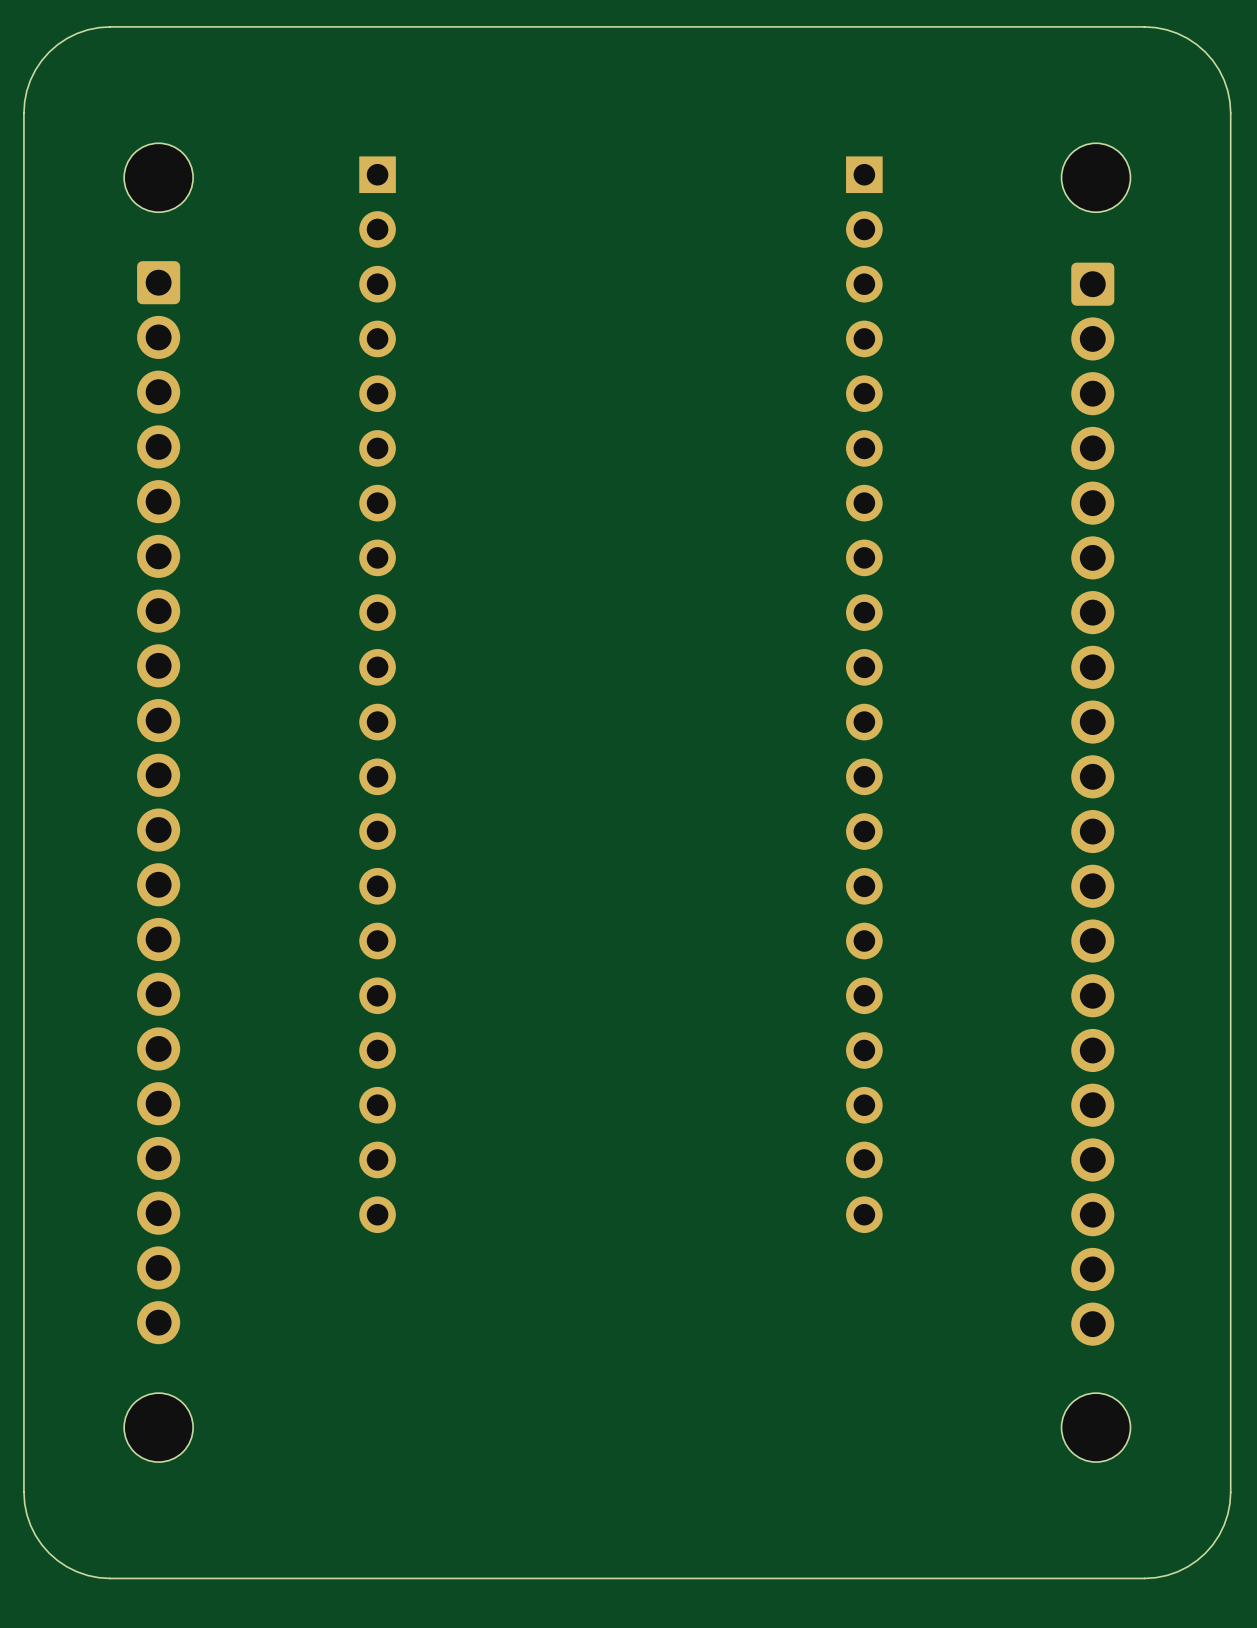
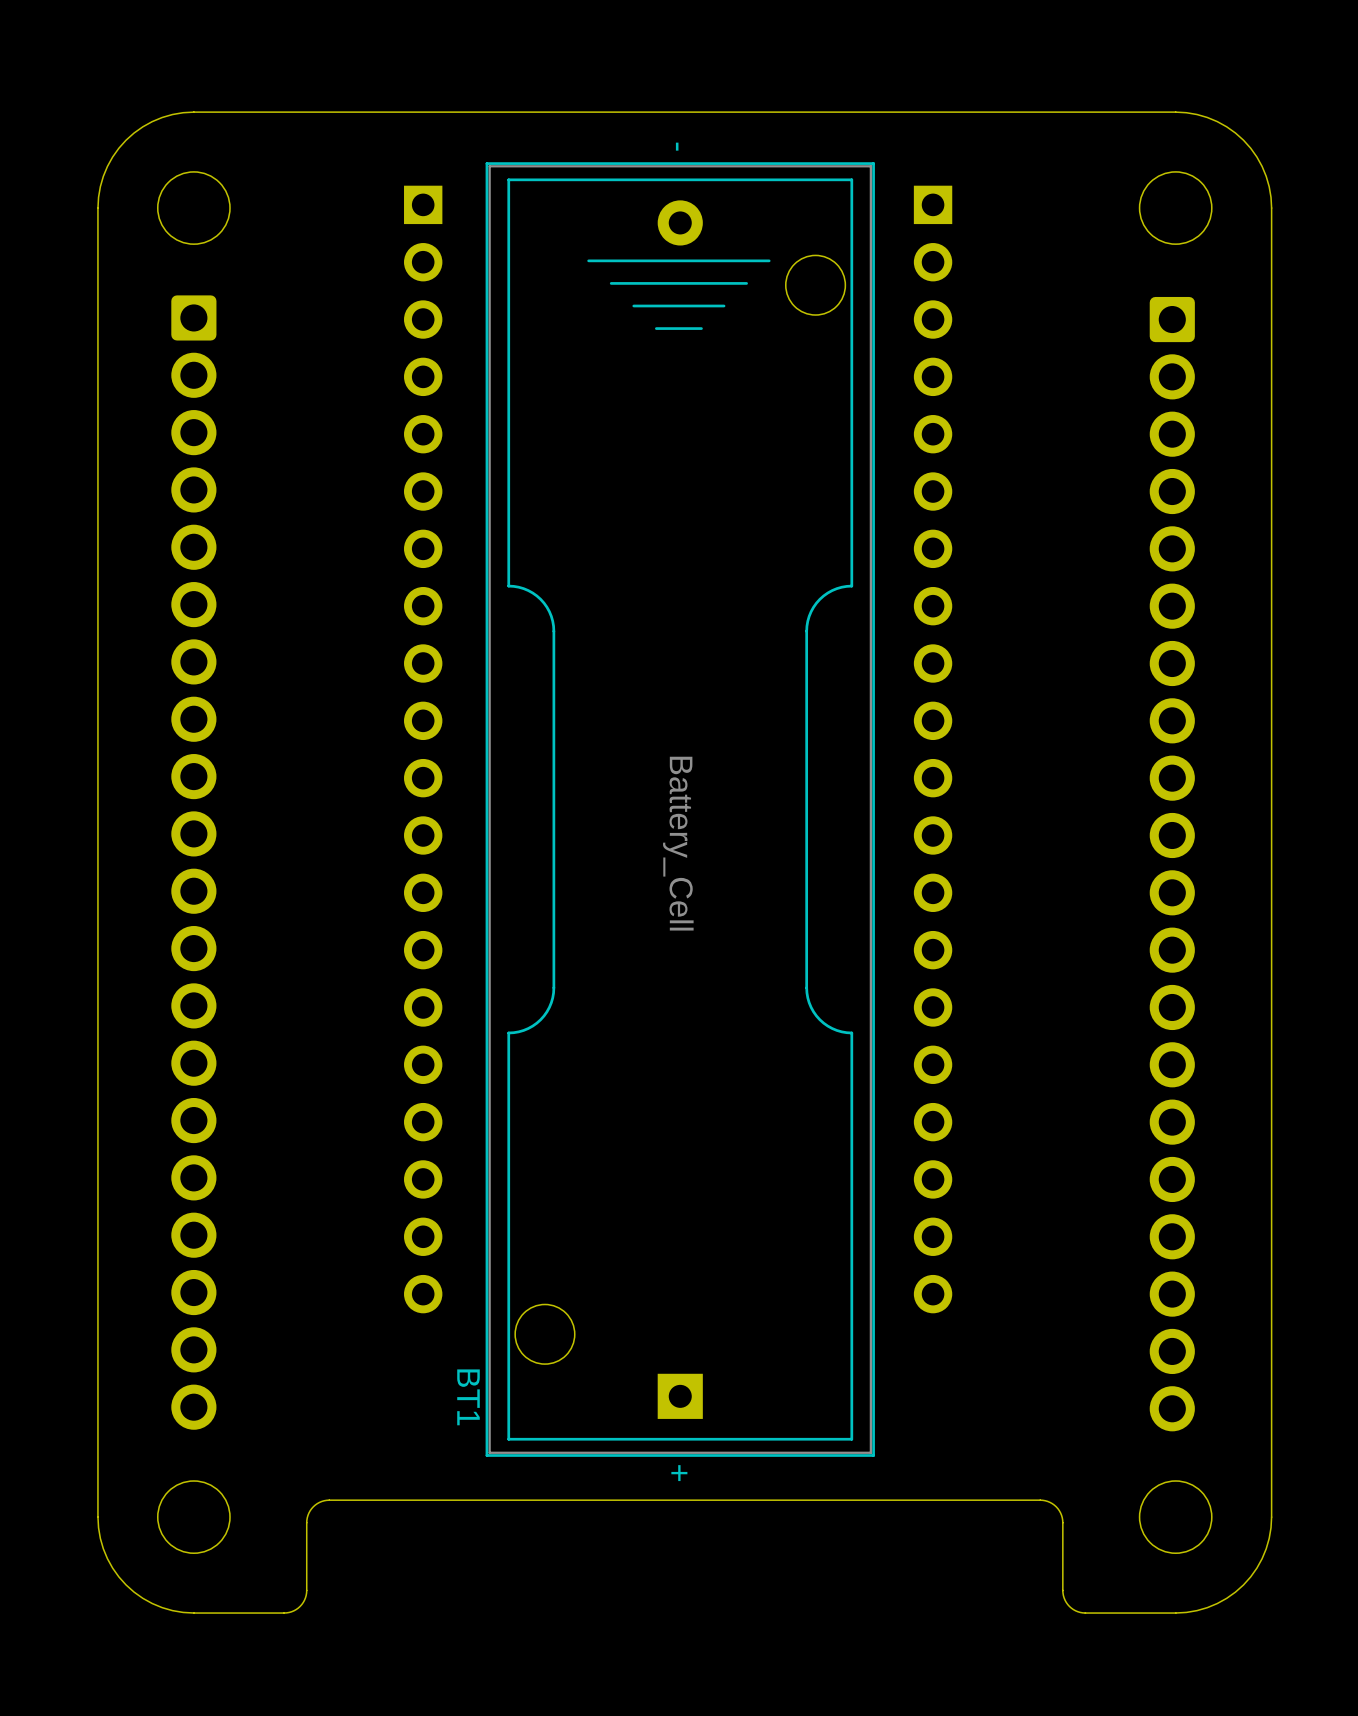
board edge: (1144, 26) (110, 26) (87, 29) (67, 38) (41, 60) (30, 80) (23, 113) (23, 1492) (26, 1514) (35, 1535) (57, 1560) (77, 1571) (110, 1578) (1144, 1578) (1166, 1575) (1187, 1566) (1212, 1544) (1224, 1525) (1230, 1492) (1230, 113) (1224, 80) (1205, 52) (1177, 33) (1144, 26) -> (1175, 112) (1197, 114) (1217, 121) (1243, 140) (1262, 166) (1269, 186) (1271, 208) (1271, 1517) (1269, 1538) (1256, 1568) (1243, 1584) (1226, 1598) (1197, 1610) (1175, 1613) (1082, 1612) (1069, 1606) (1063, 1595) (1061, 1515) (1054, 1505) (1042, 1500) (329, 1500) (317, 1503) (308, 1515) (306, 1592) (301, 1604) (293, 1610) (284, 1613) (183, 1612) (162, 1607) (142, 1598) (126, 1584) (112, 1568) (100, 1538) (97, 1517) (97, 208) (100, 186) (112, 157) (126, 140) (142, 126) (162, 117) (193, 112) (1175, 112)
BT1: none -> Battery_Cell (680, 809)

